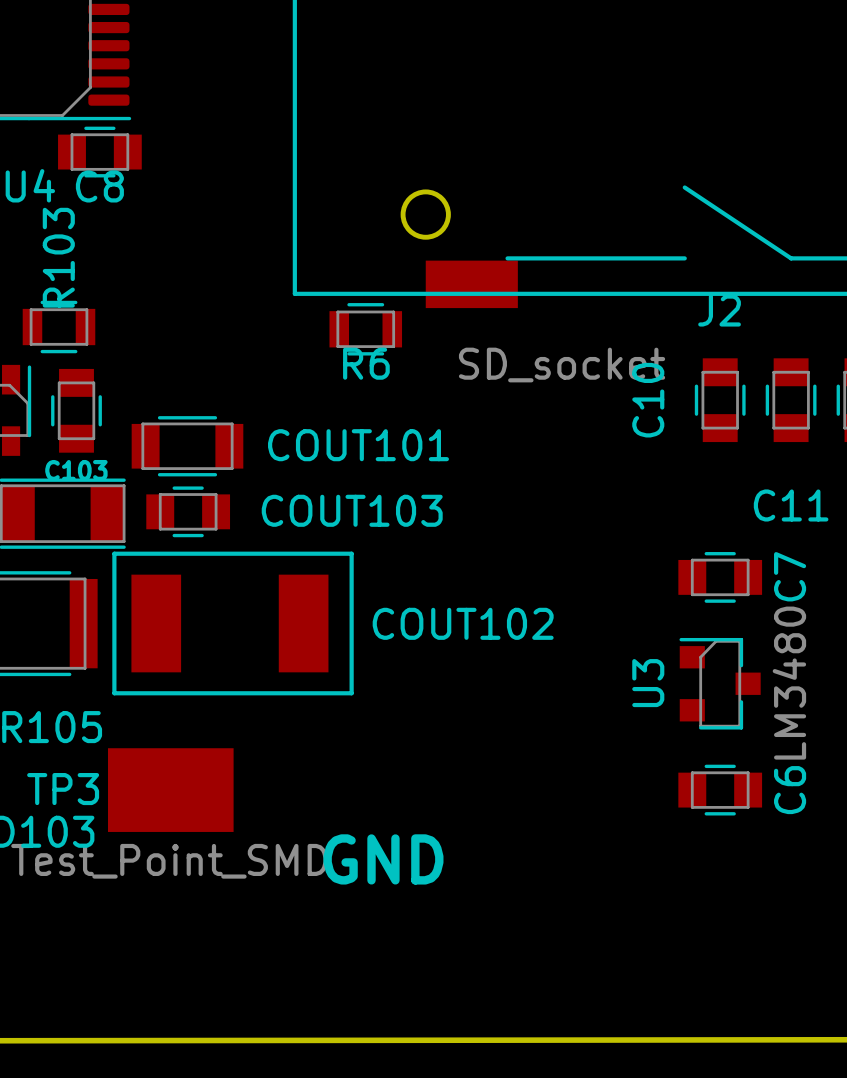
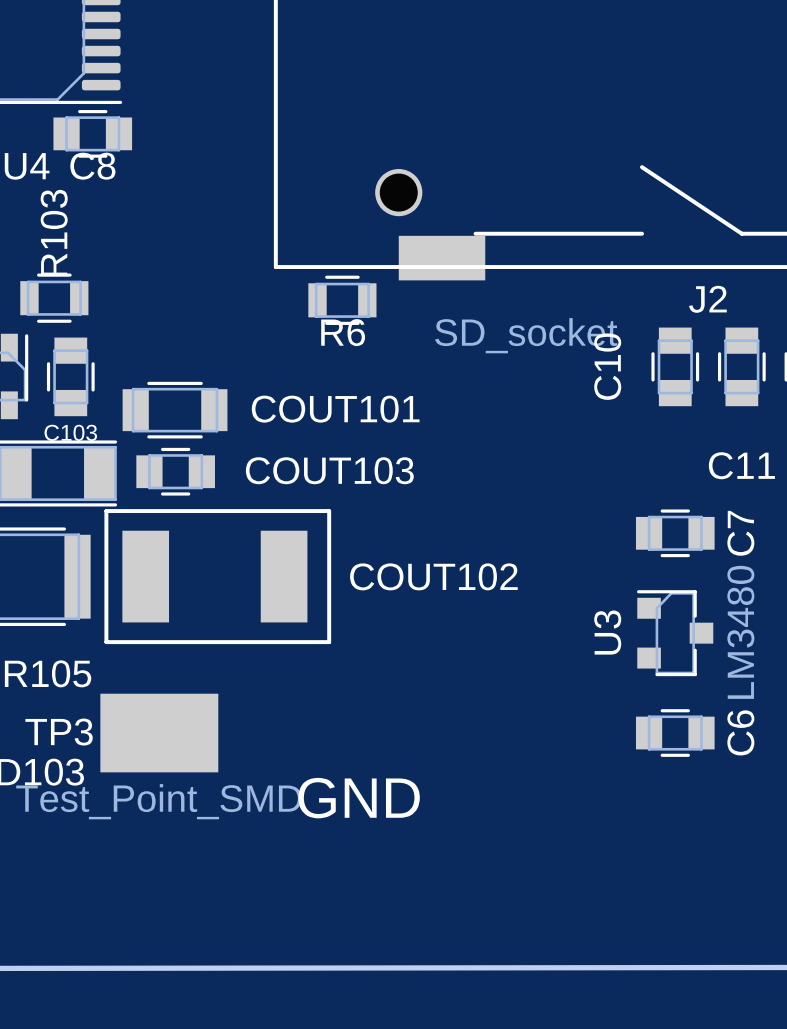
J2 name position: J2 (719, 310) -> J2 (707, 299)

